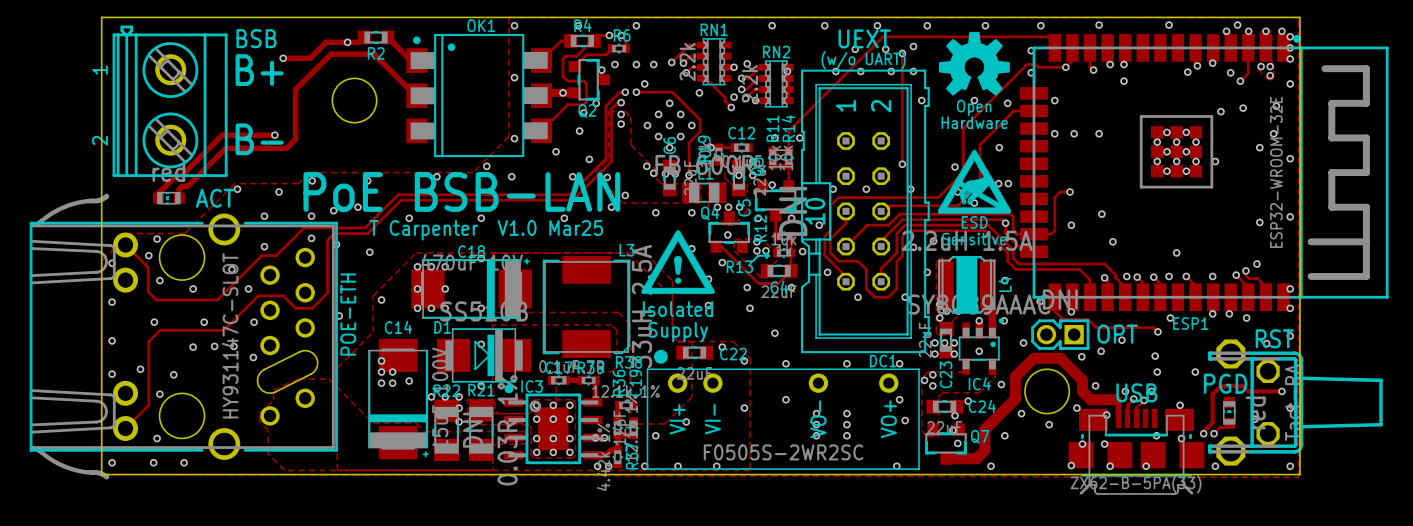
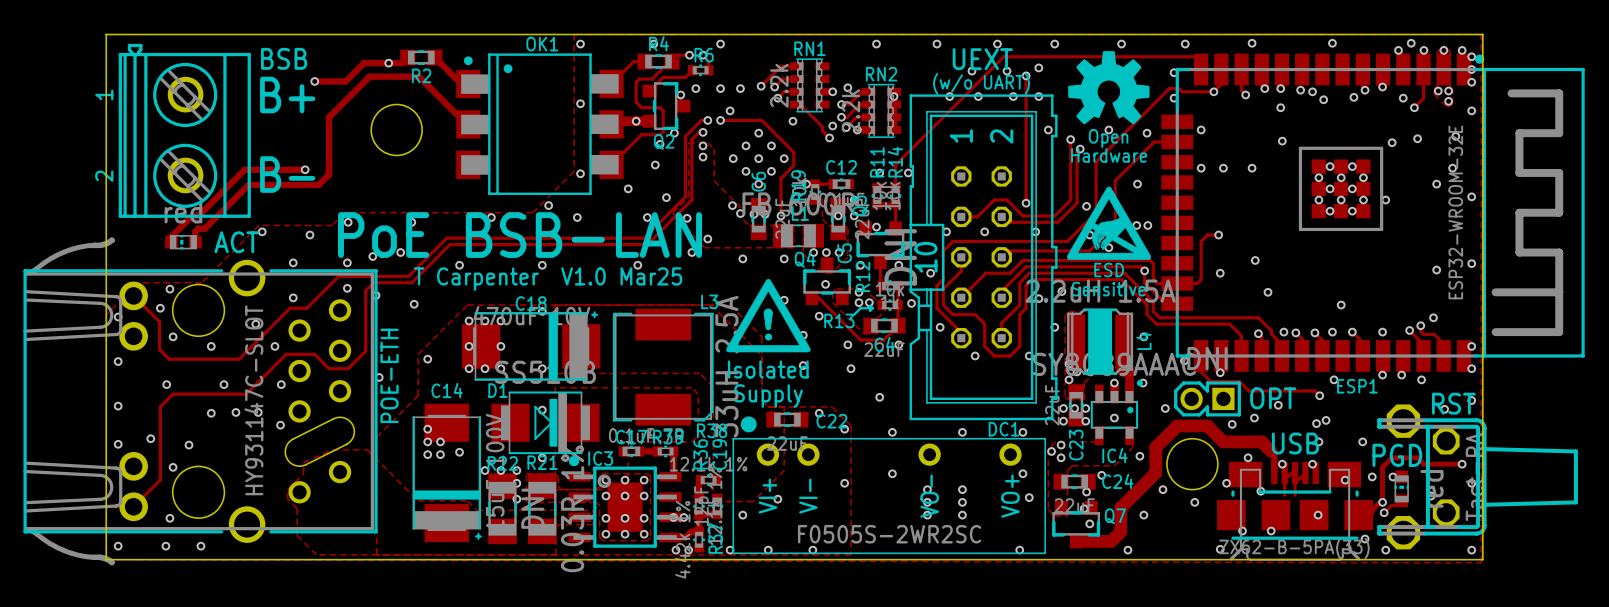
via: none -> (1300, 90)
via: none -> (1312, 91)
via: none -> (1323, 99)
track: none -> (1070, 139) (1070, 200) (1054, 215) (1022, 215) (1007, 200) (994, 200) (977, 216) (961, 216)
via: none -> (1070, 139)
via: none -> (1282, 141)
track: none -> (1080, 149) (1077, 152) (1077, 203) (1057, 222) (1007, 222) (1001, 216)
via: none -> (1080, 149)
via: none -> (1326, 420)
track: (1074, 372) (1082, 380) (1082, 391) (1090, 399) (1118, 399) (1118, 418) -> (1223, 441) (1261, 441) (1271, 451) (1274, 451) (1274, 472)
via: (1133, 399) -> none
via: (1144, 400) -> none
via: none -> (1372, 476)
via: none -> (1392, 476)
via: none -> (1382, 502)
via: (1203, 433) -> none
via: (1181, 438) -> none
via: (1082, 444) -> none
via: (1104, 444) -> none
via: none -> (1242, 531)
via: none -> (1271, 531)
USB position: (1136, 451) -> (1295, 511)
via: none -> (1365, 538)
via: (1110, 466) -> none
via: (1146, 466) -> none

